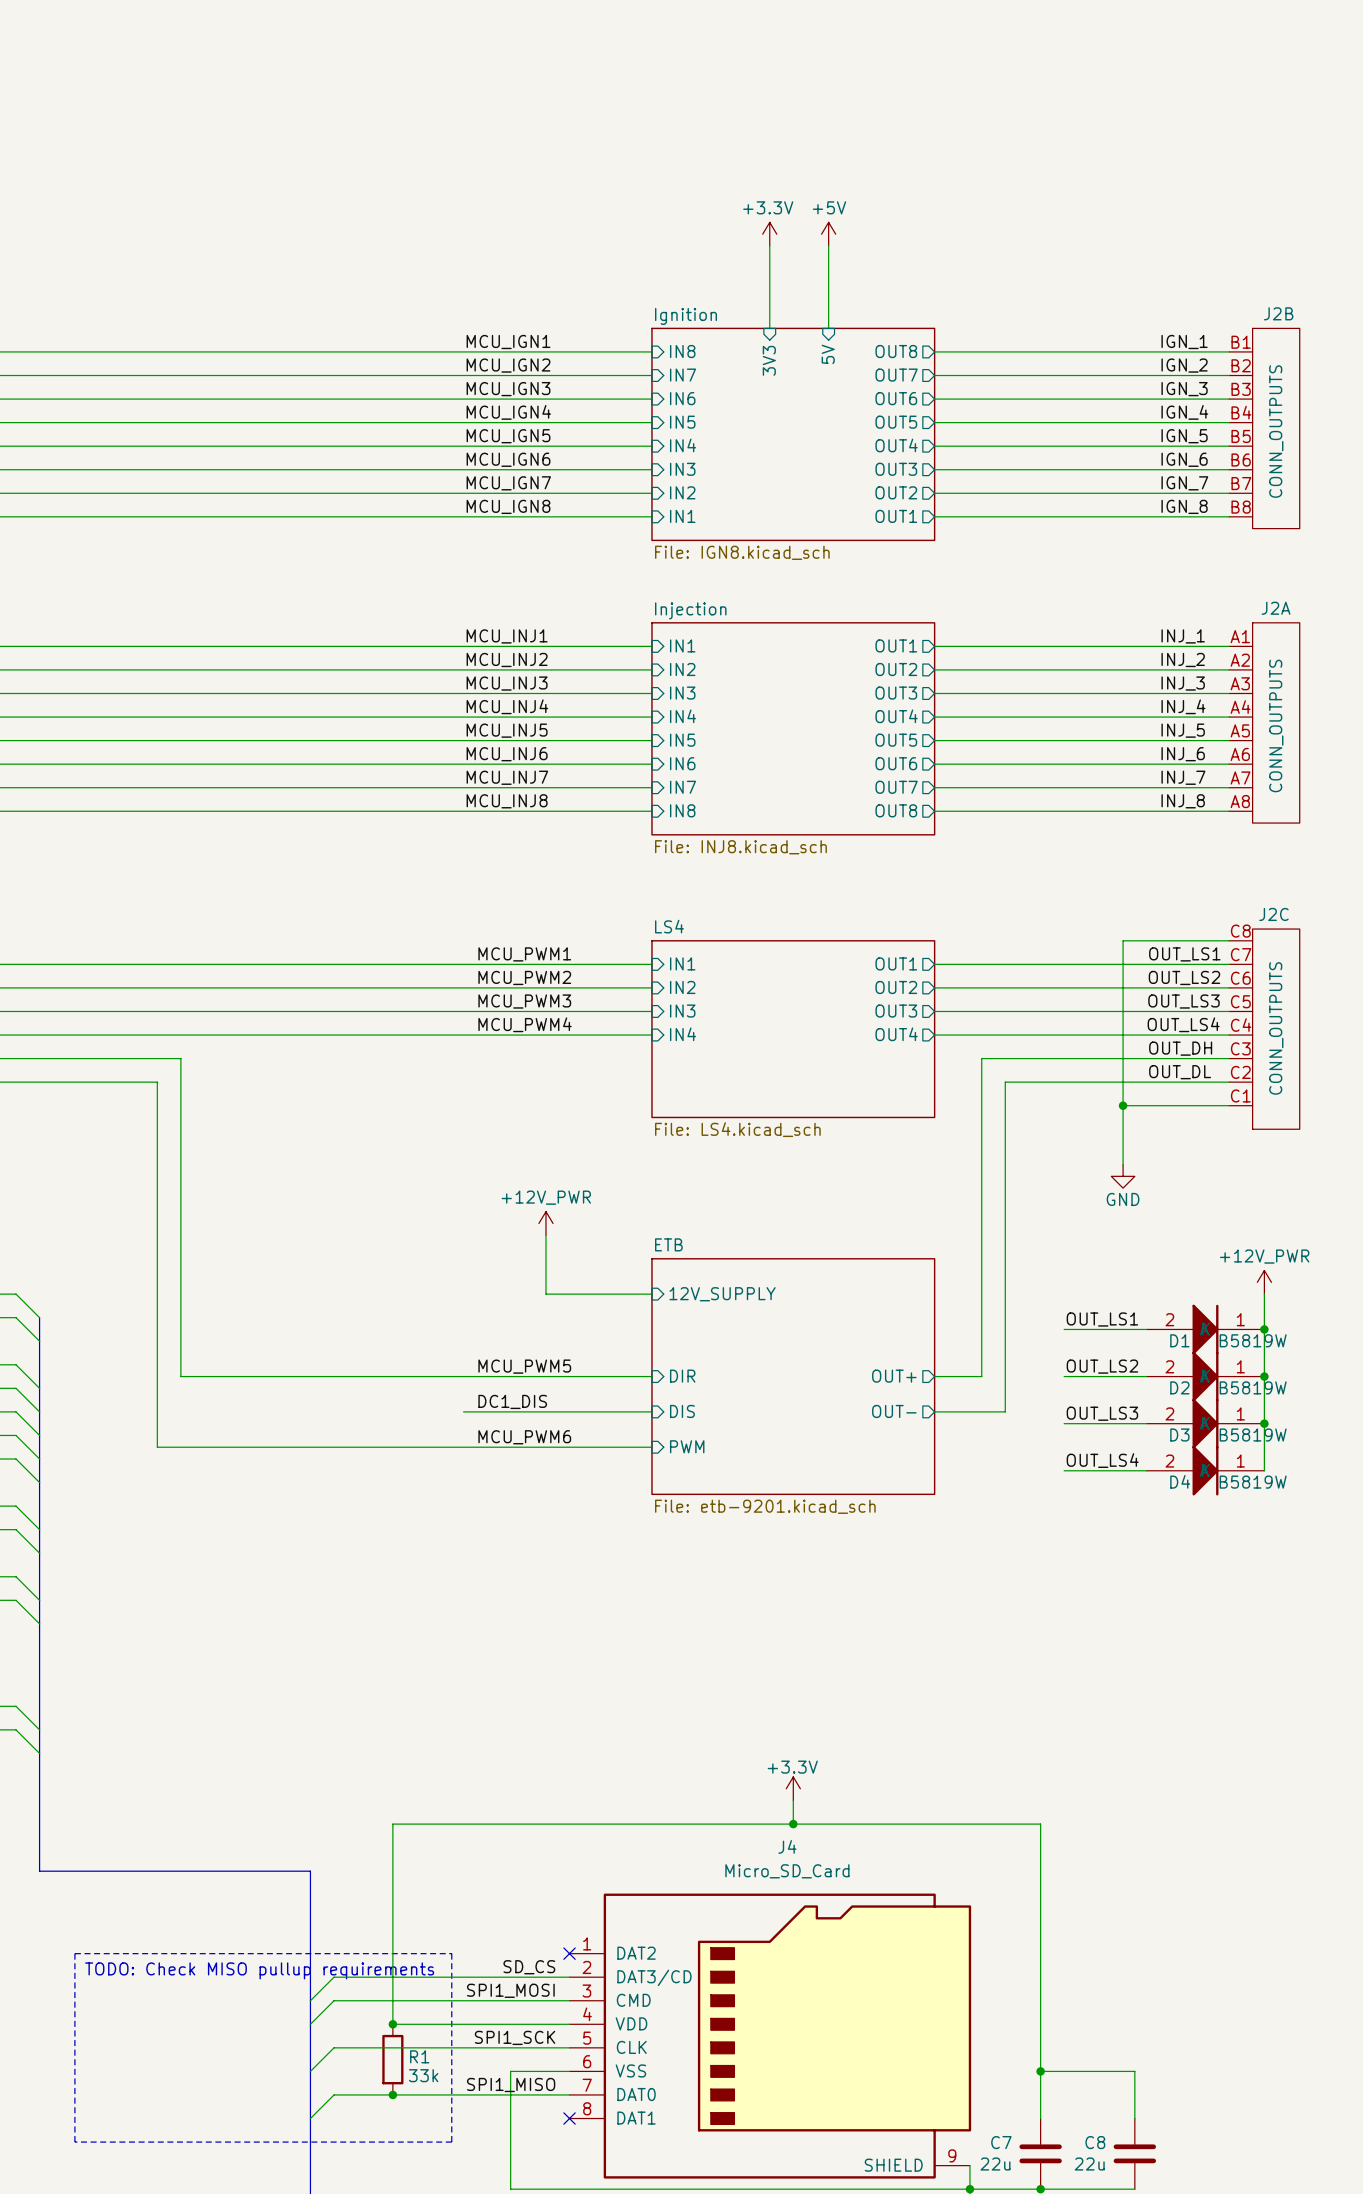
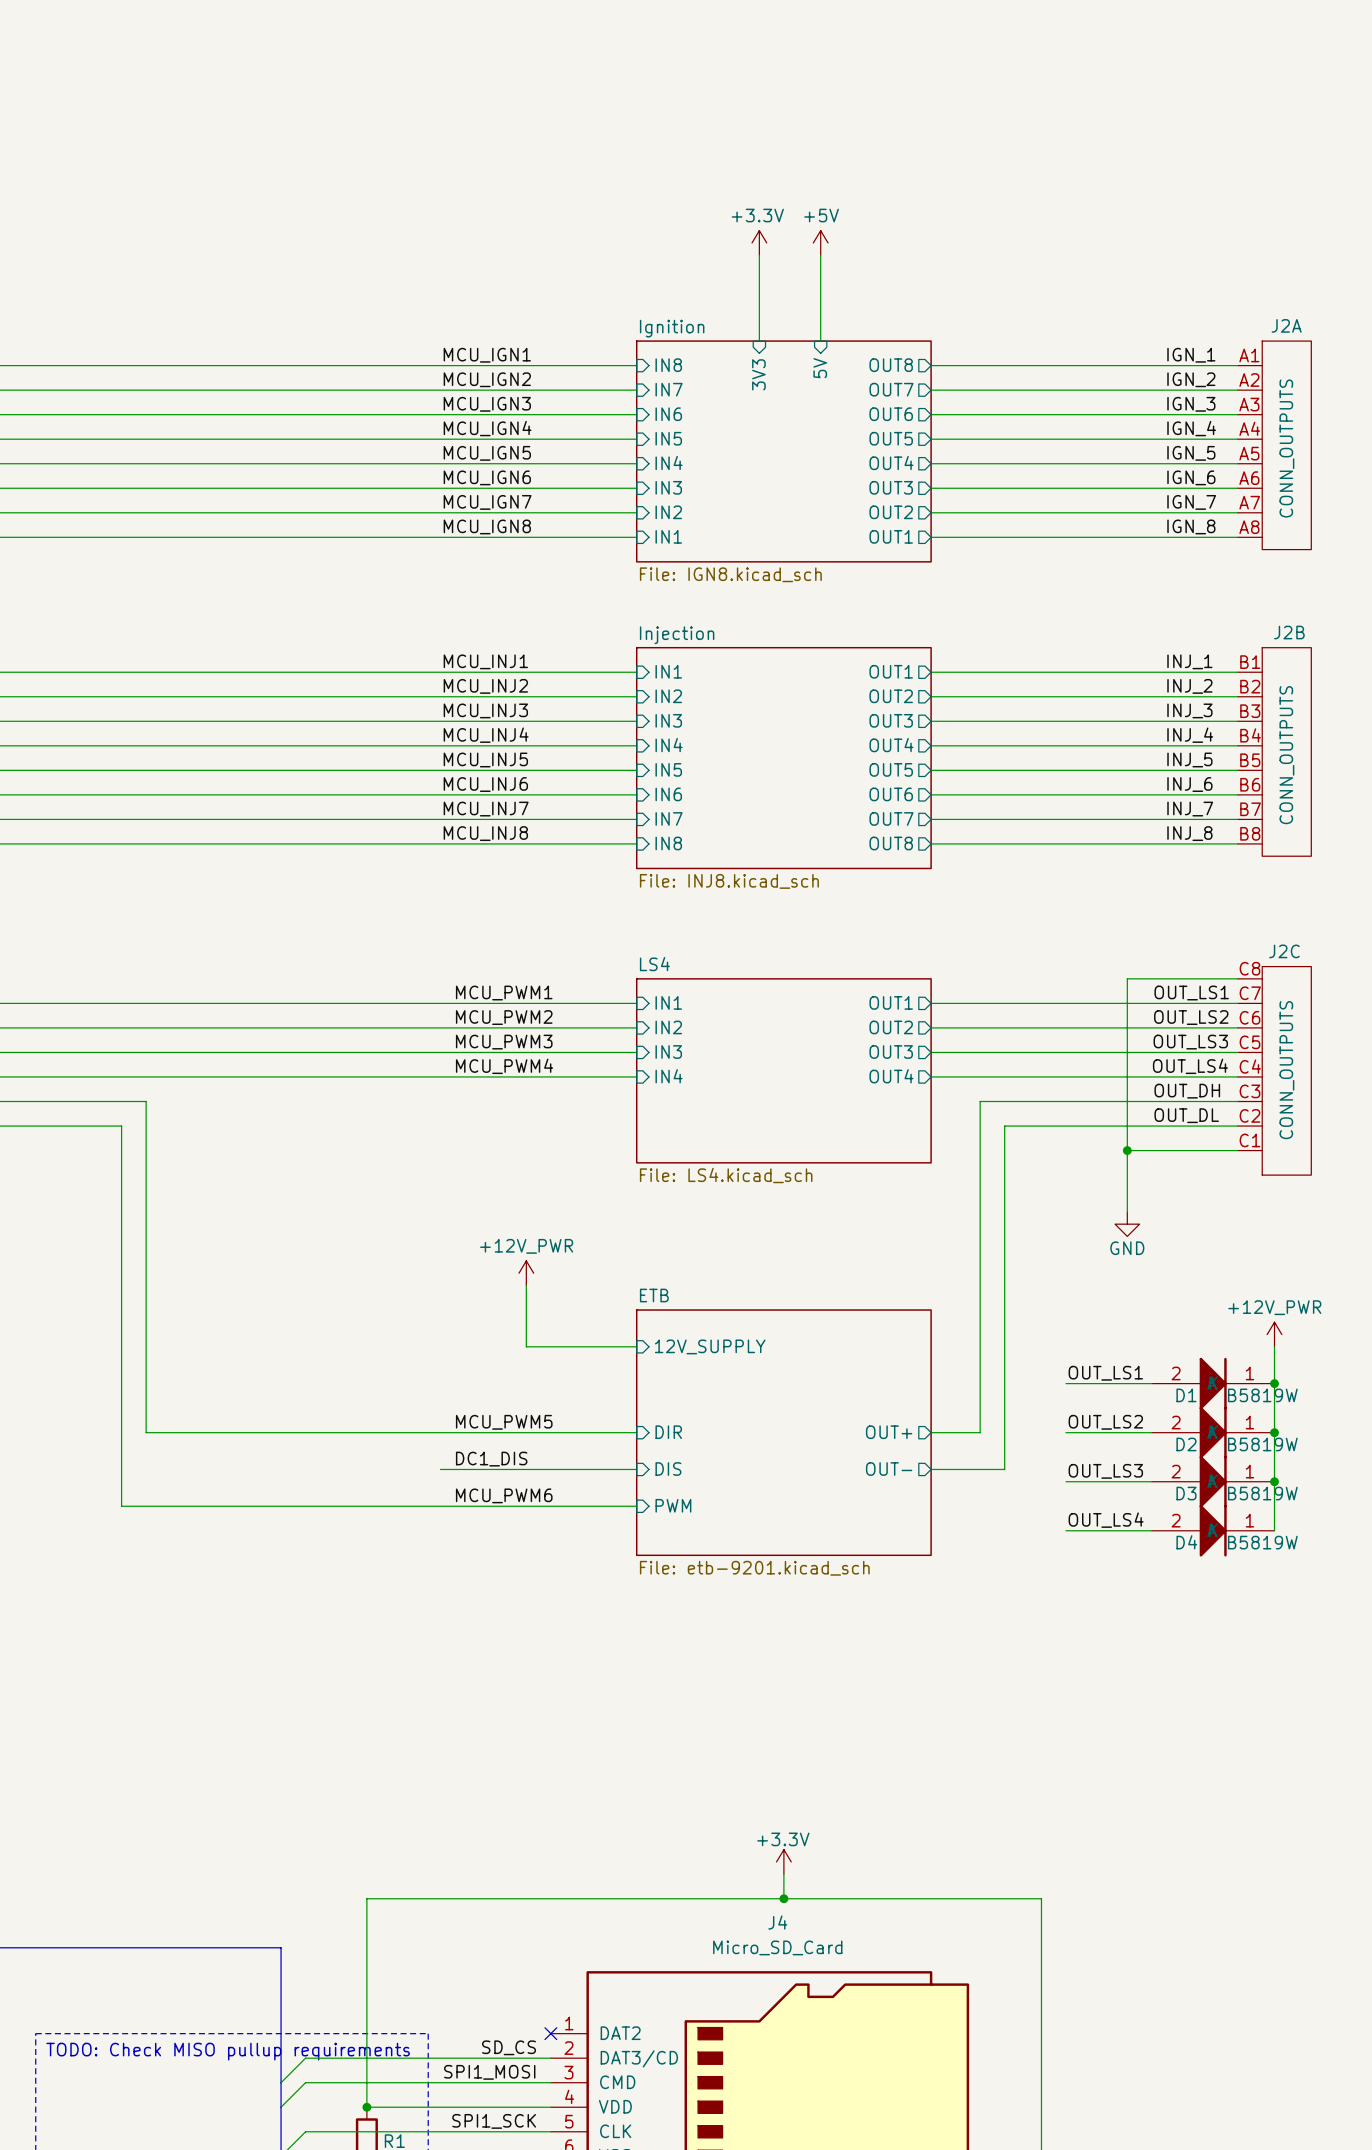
J2B position: (1264, 428) -> (1274, 751)
J2A position: (1264, 722) -> (1274, 445)

